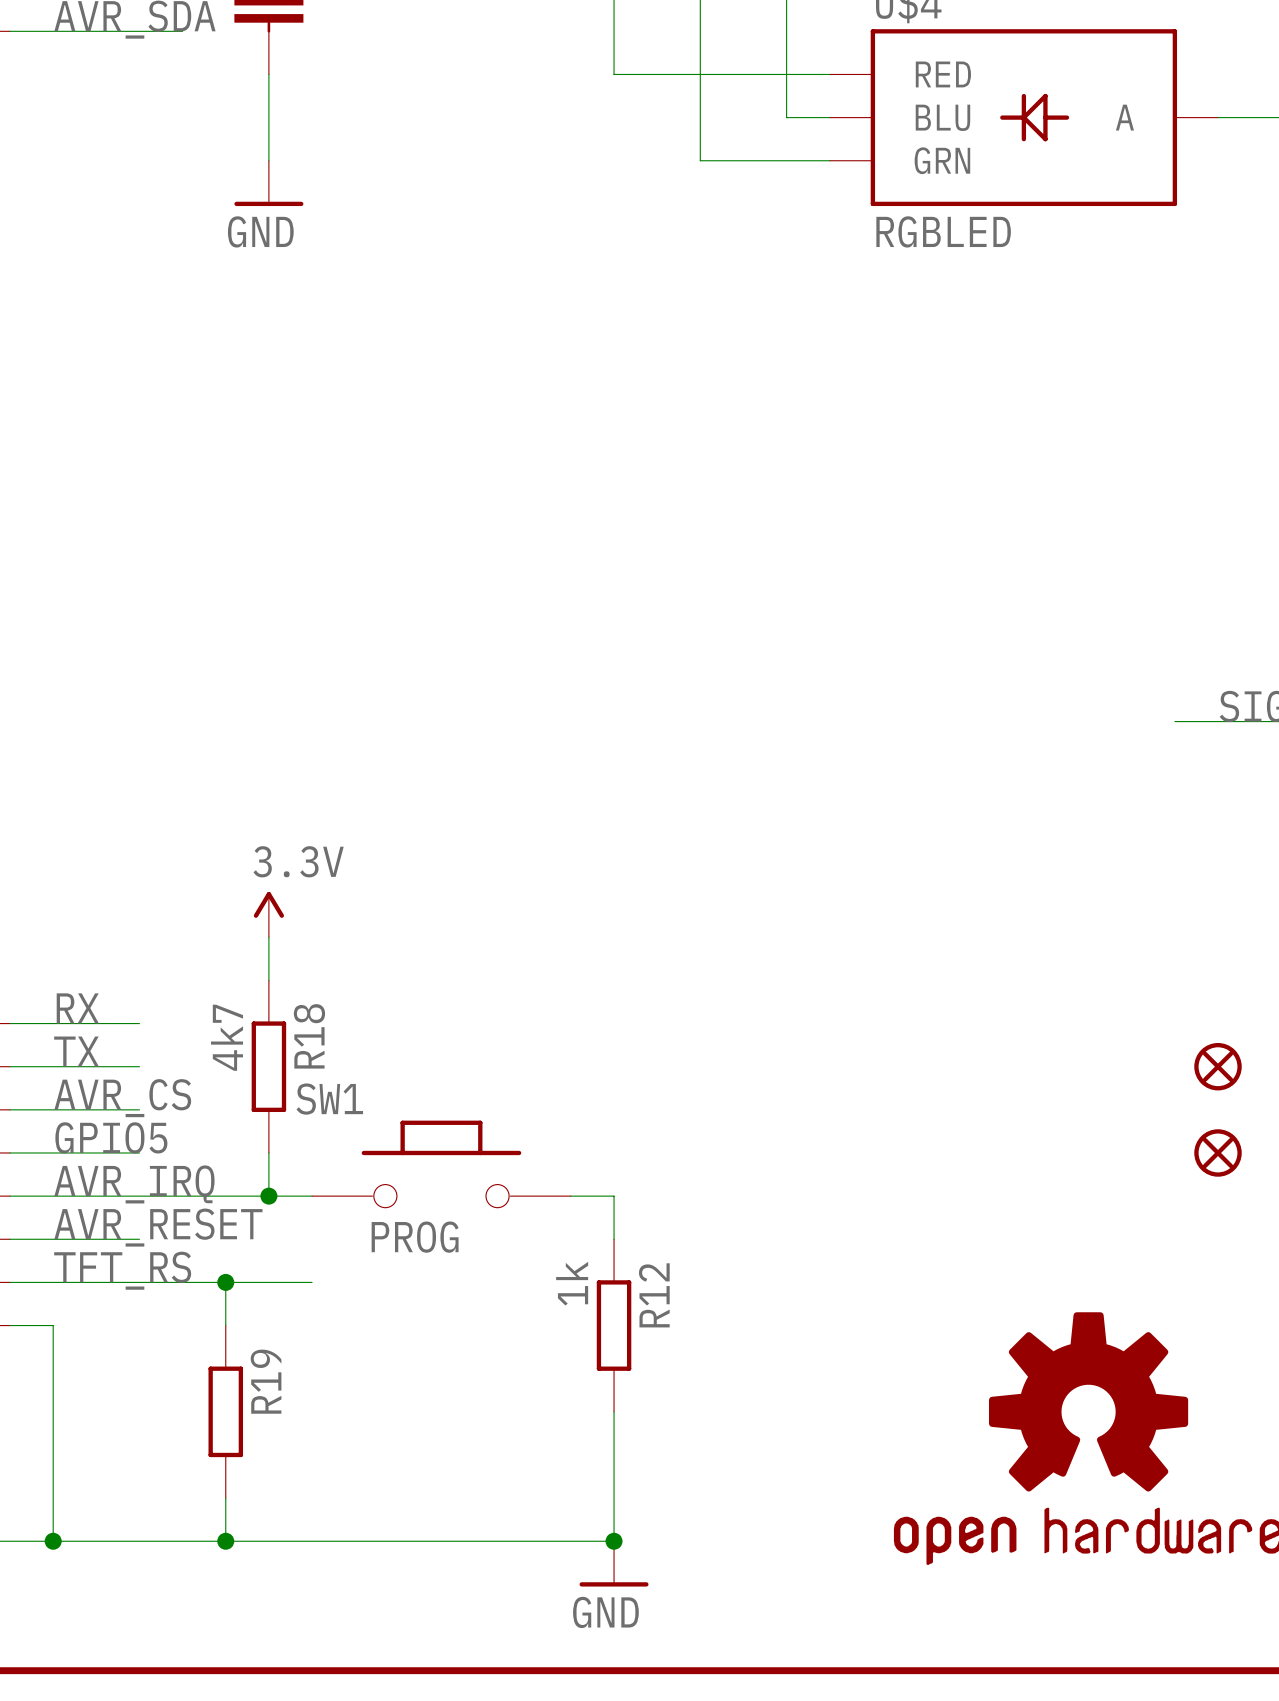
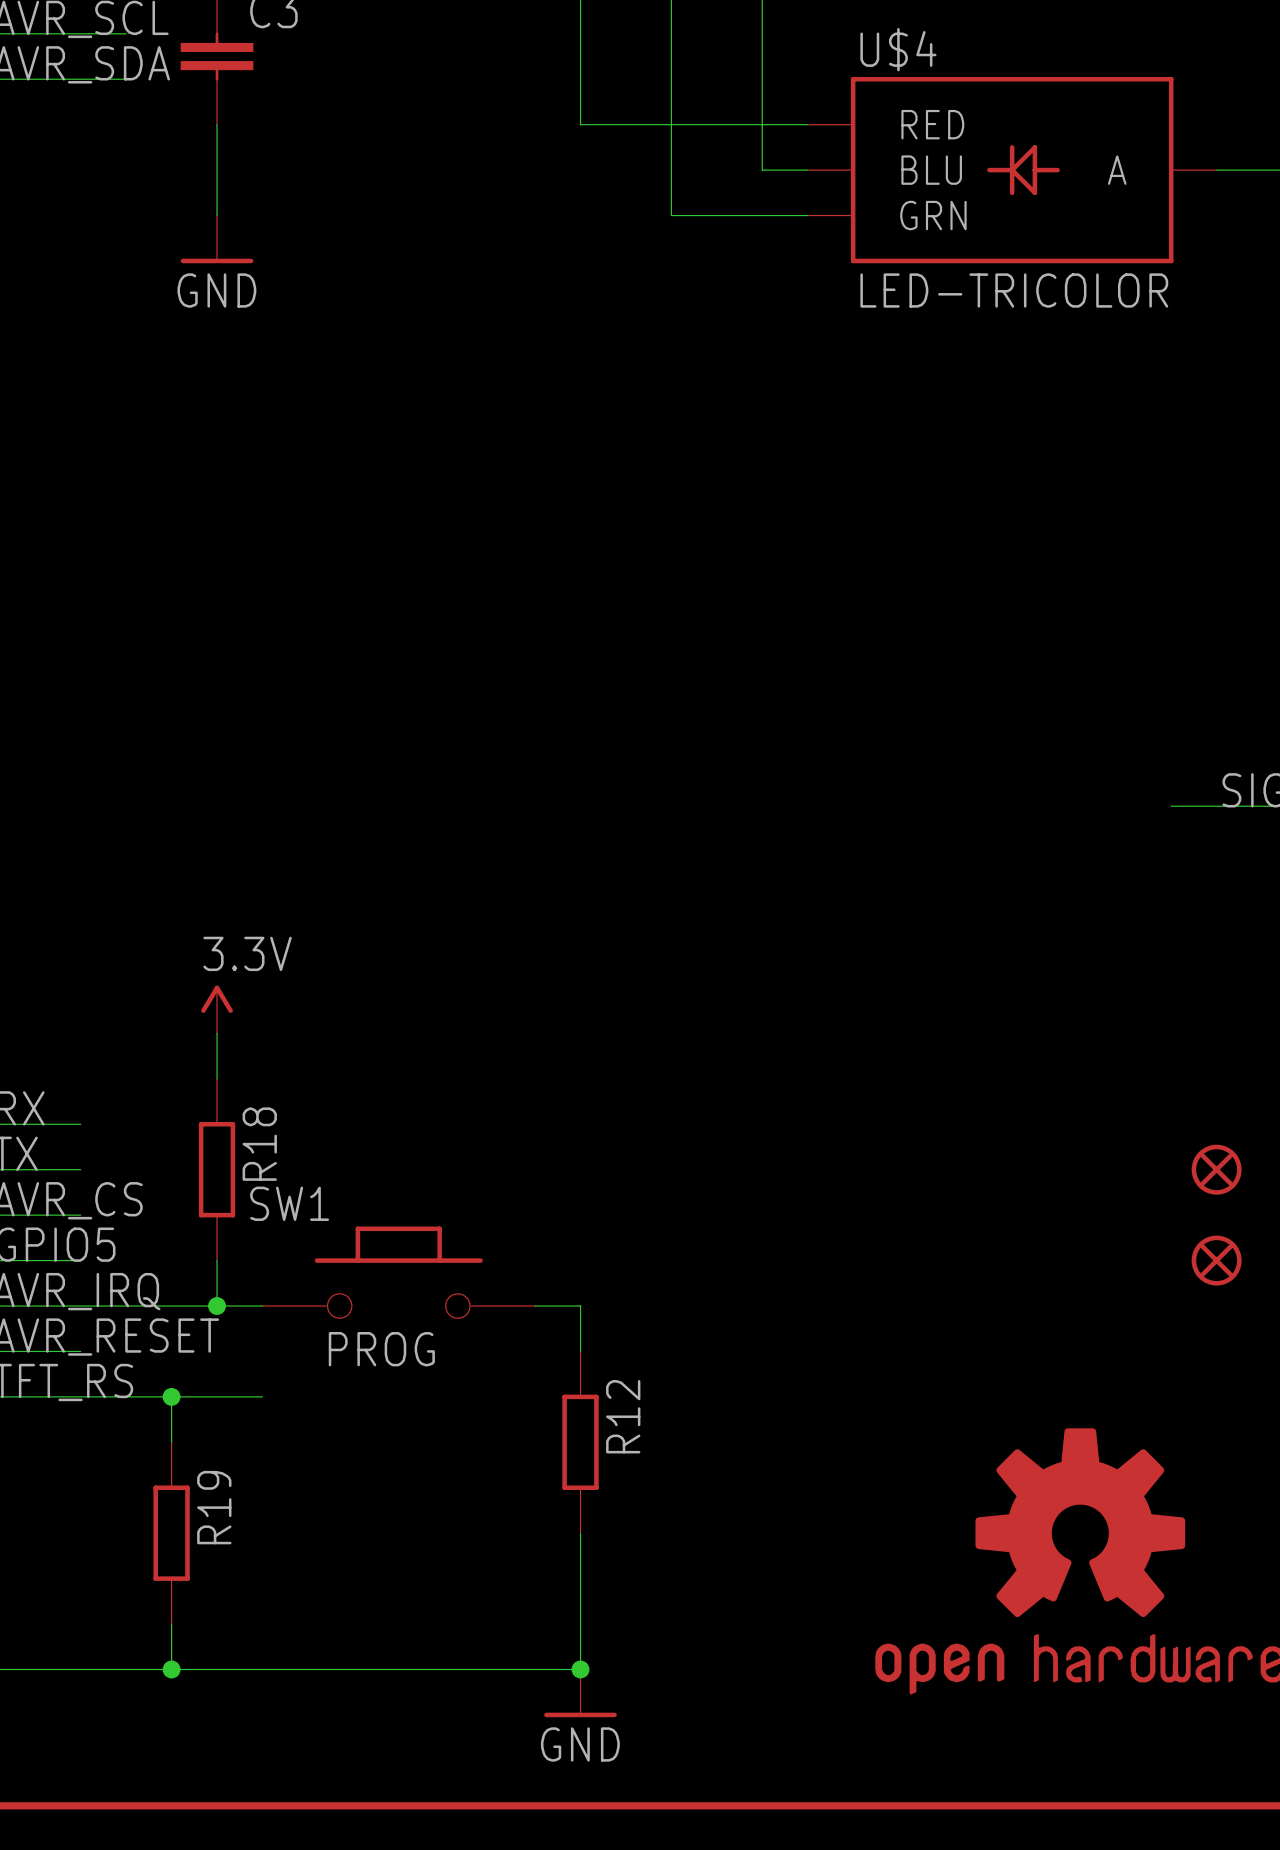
U$4 value: RGBLED (943, 231) -> LED-TRICOLOR (1014, 290)
R18 value: 4k7 (227, 1037) -> none
R12 value: 1k (572, 1283) -> none

